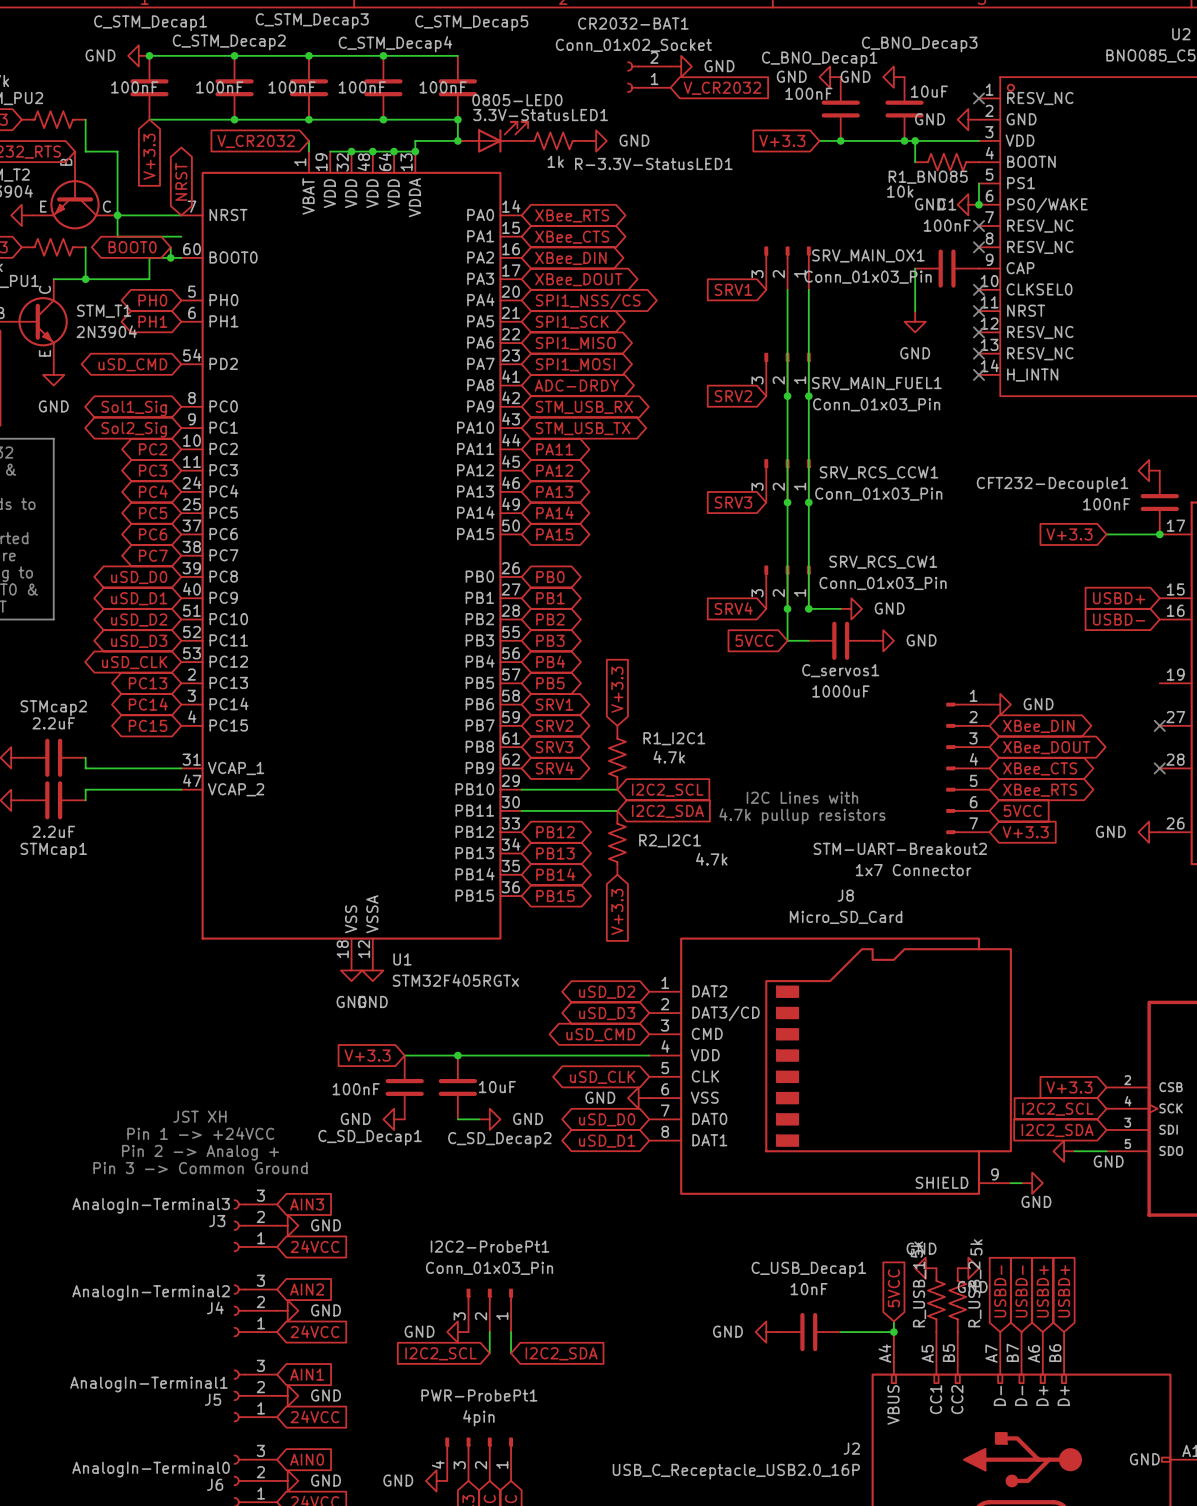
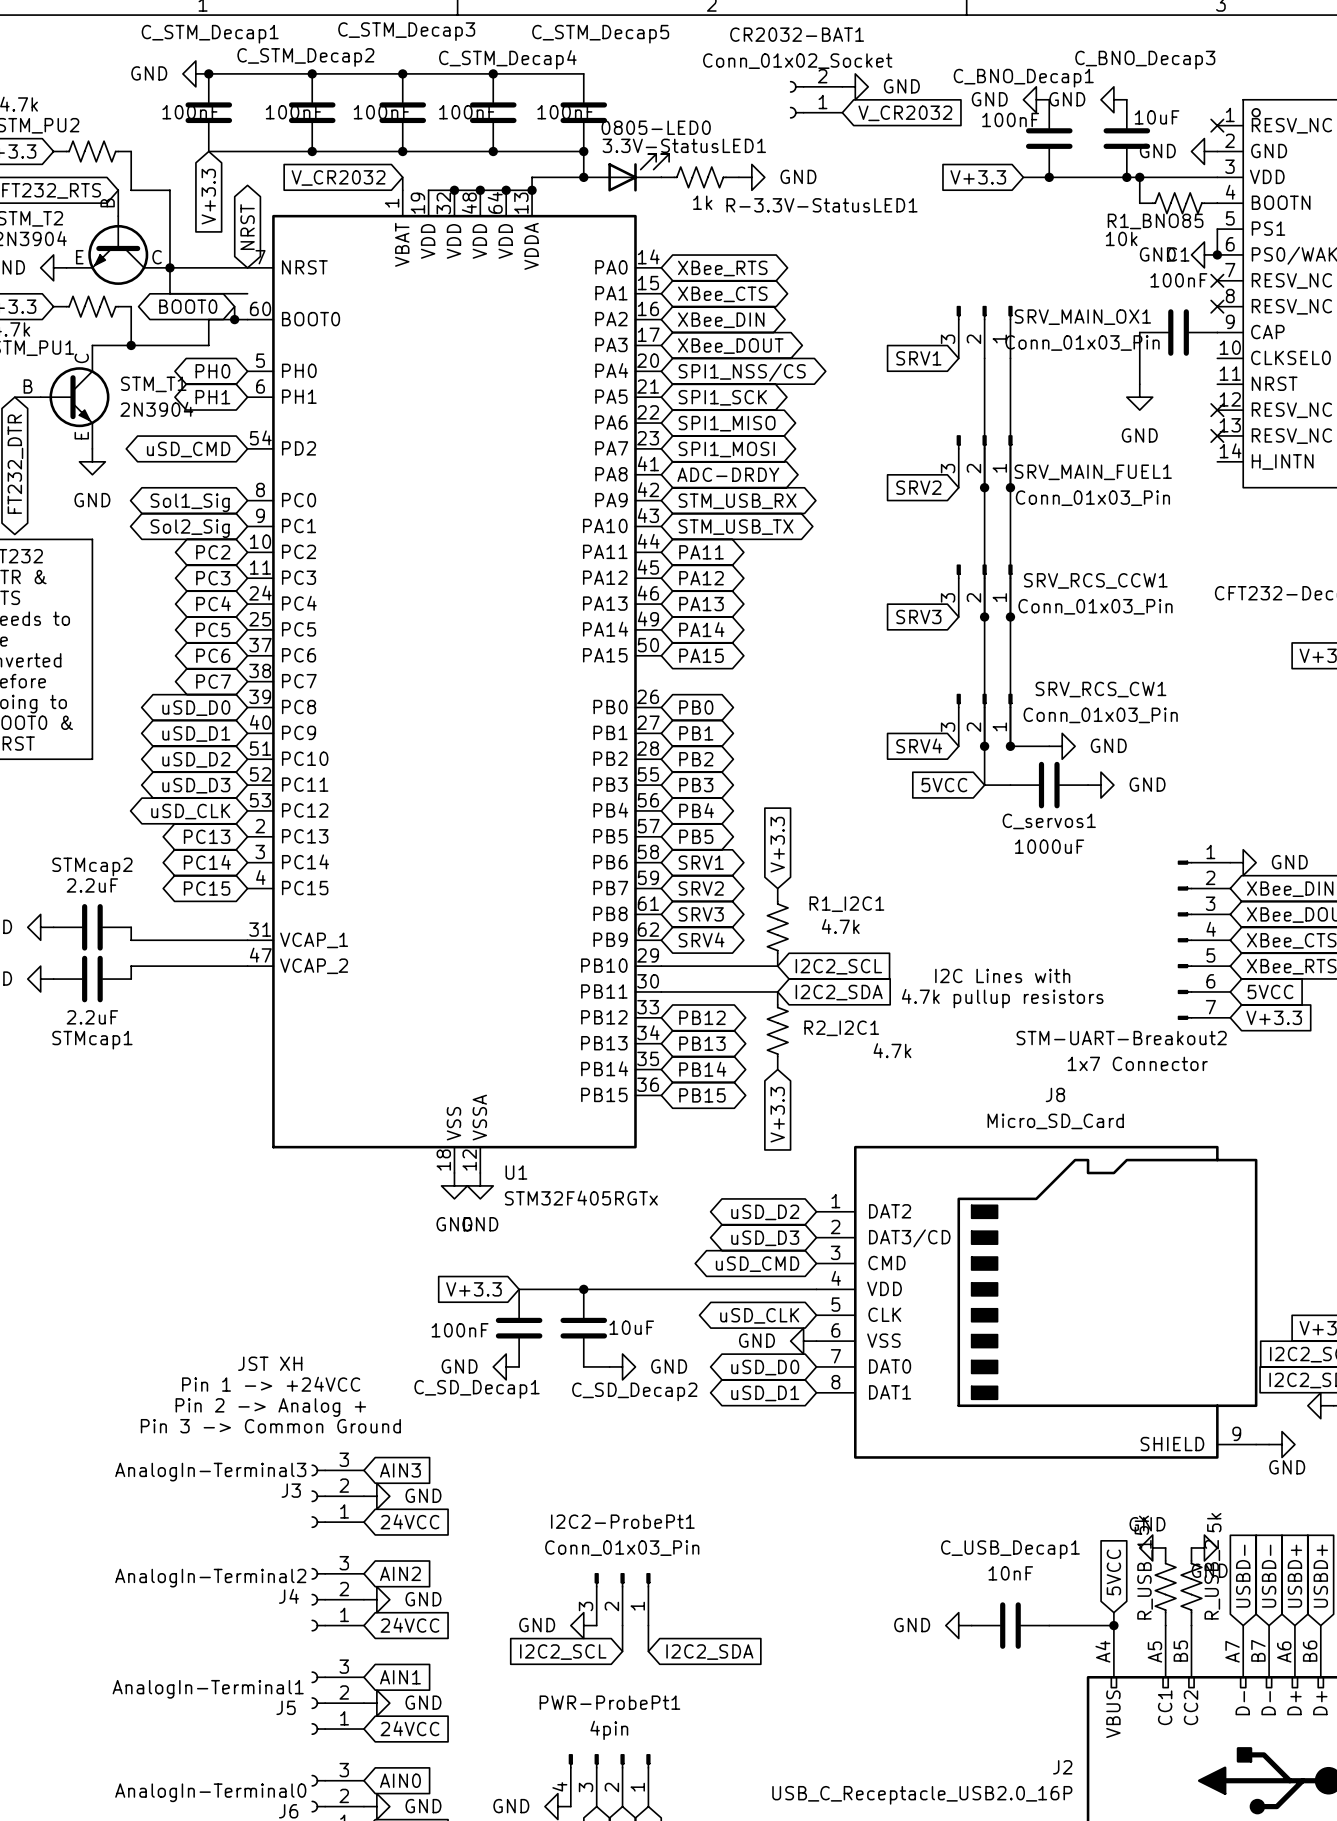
no-connect mark: (978, 289) -> none
no-connect mark: (978, 311) -> none
no-connect mark: (978, 374) -> none

